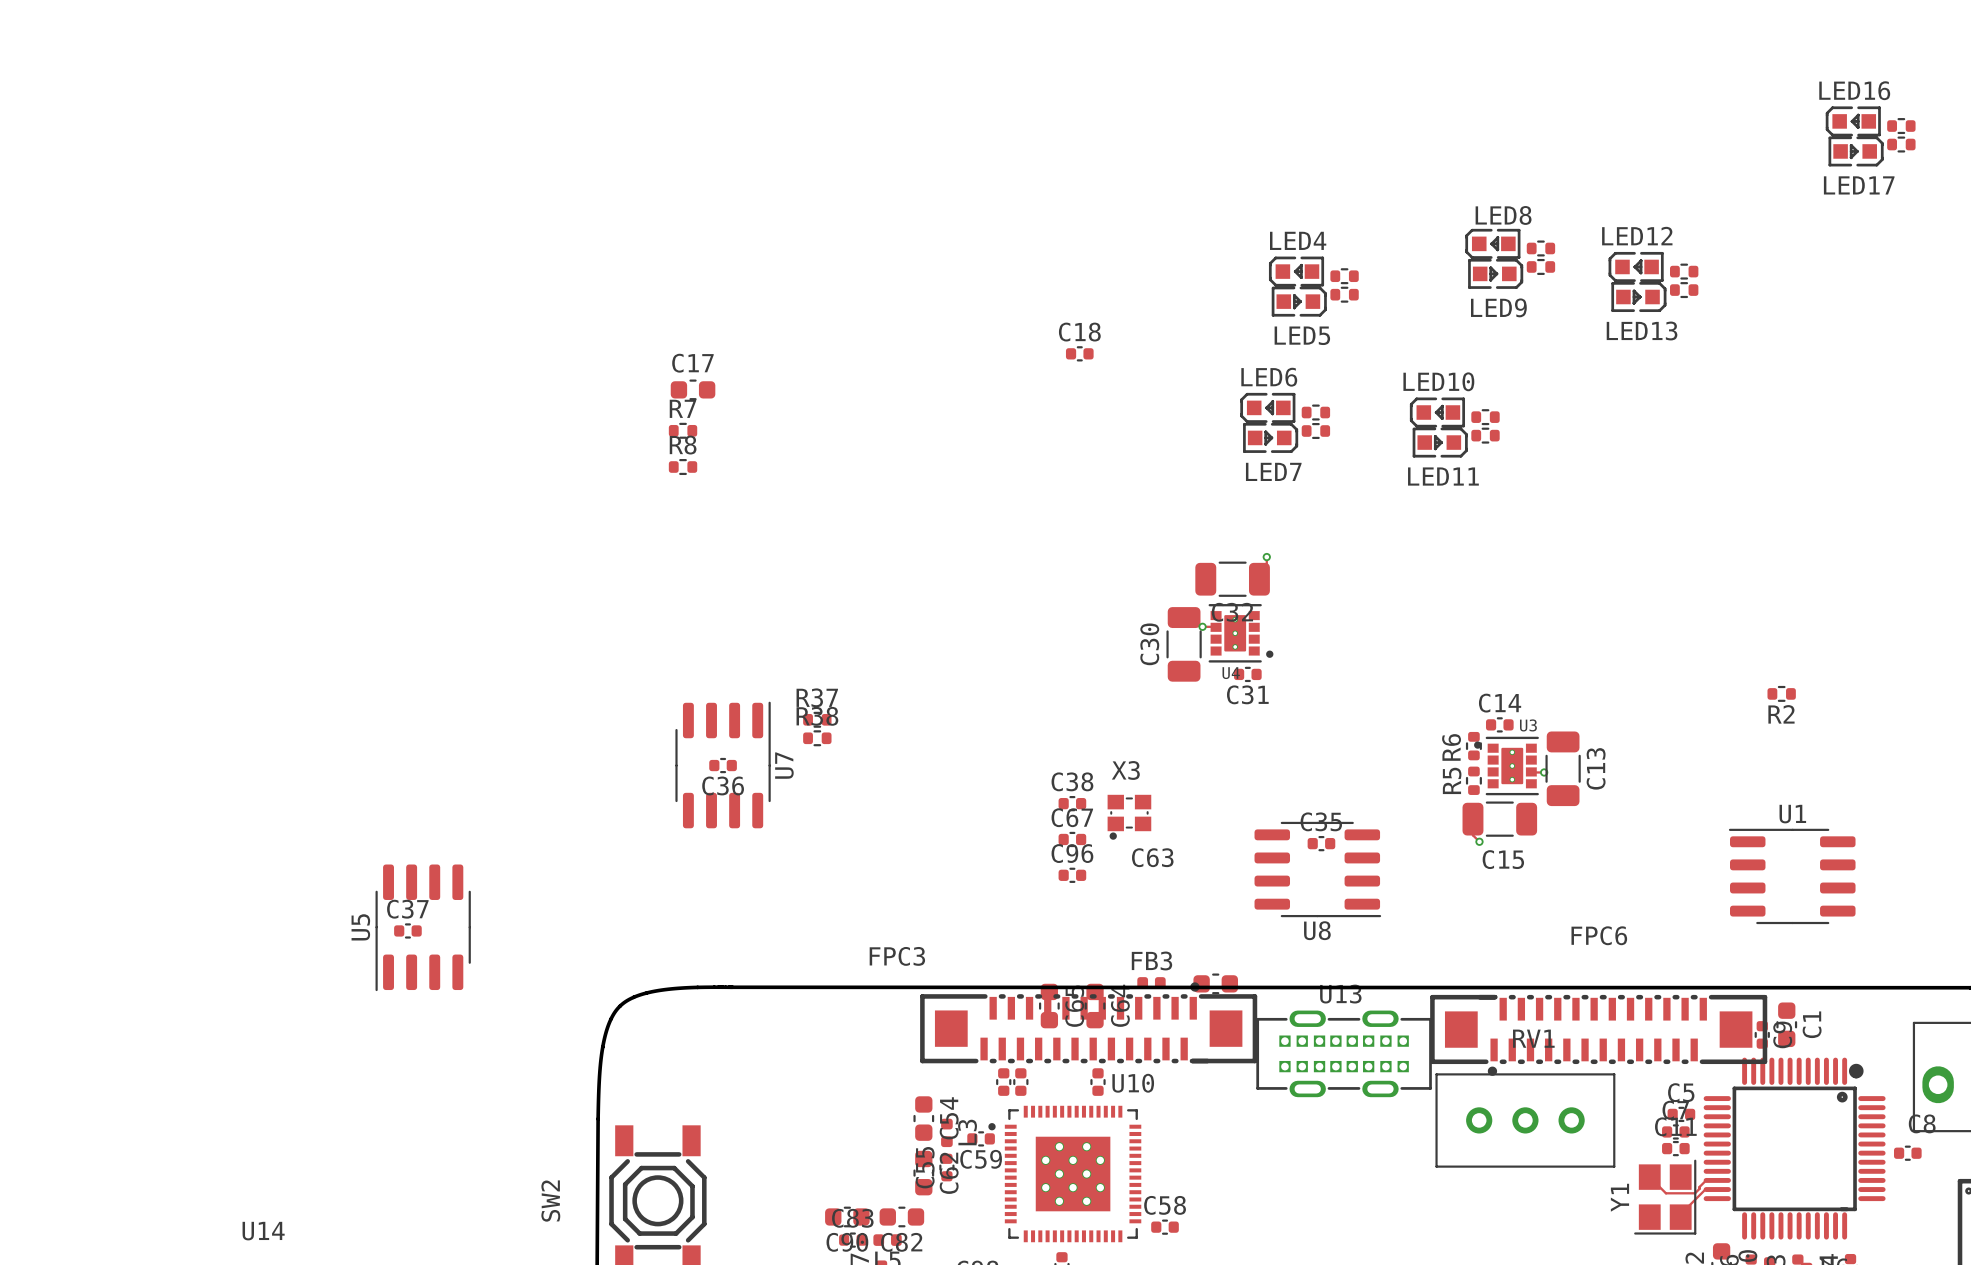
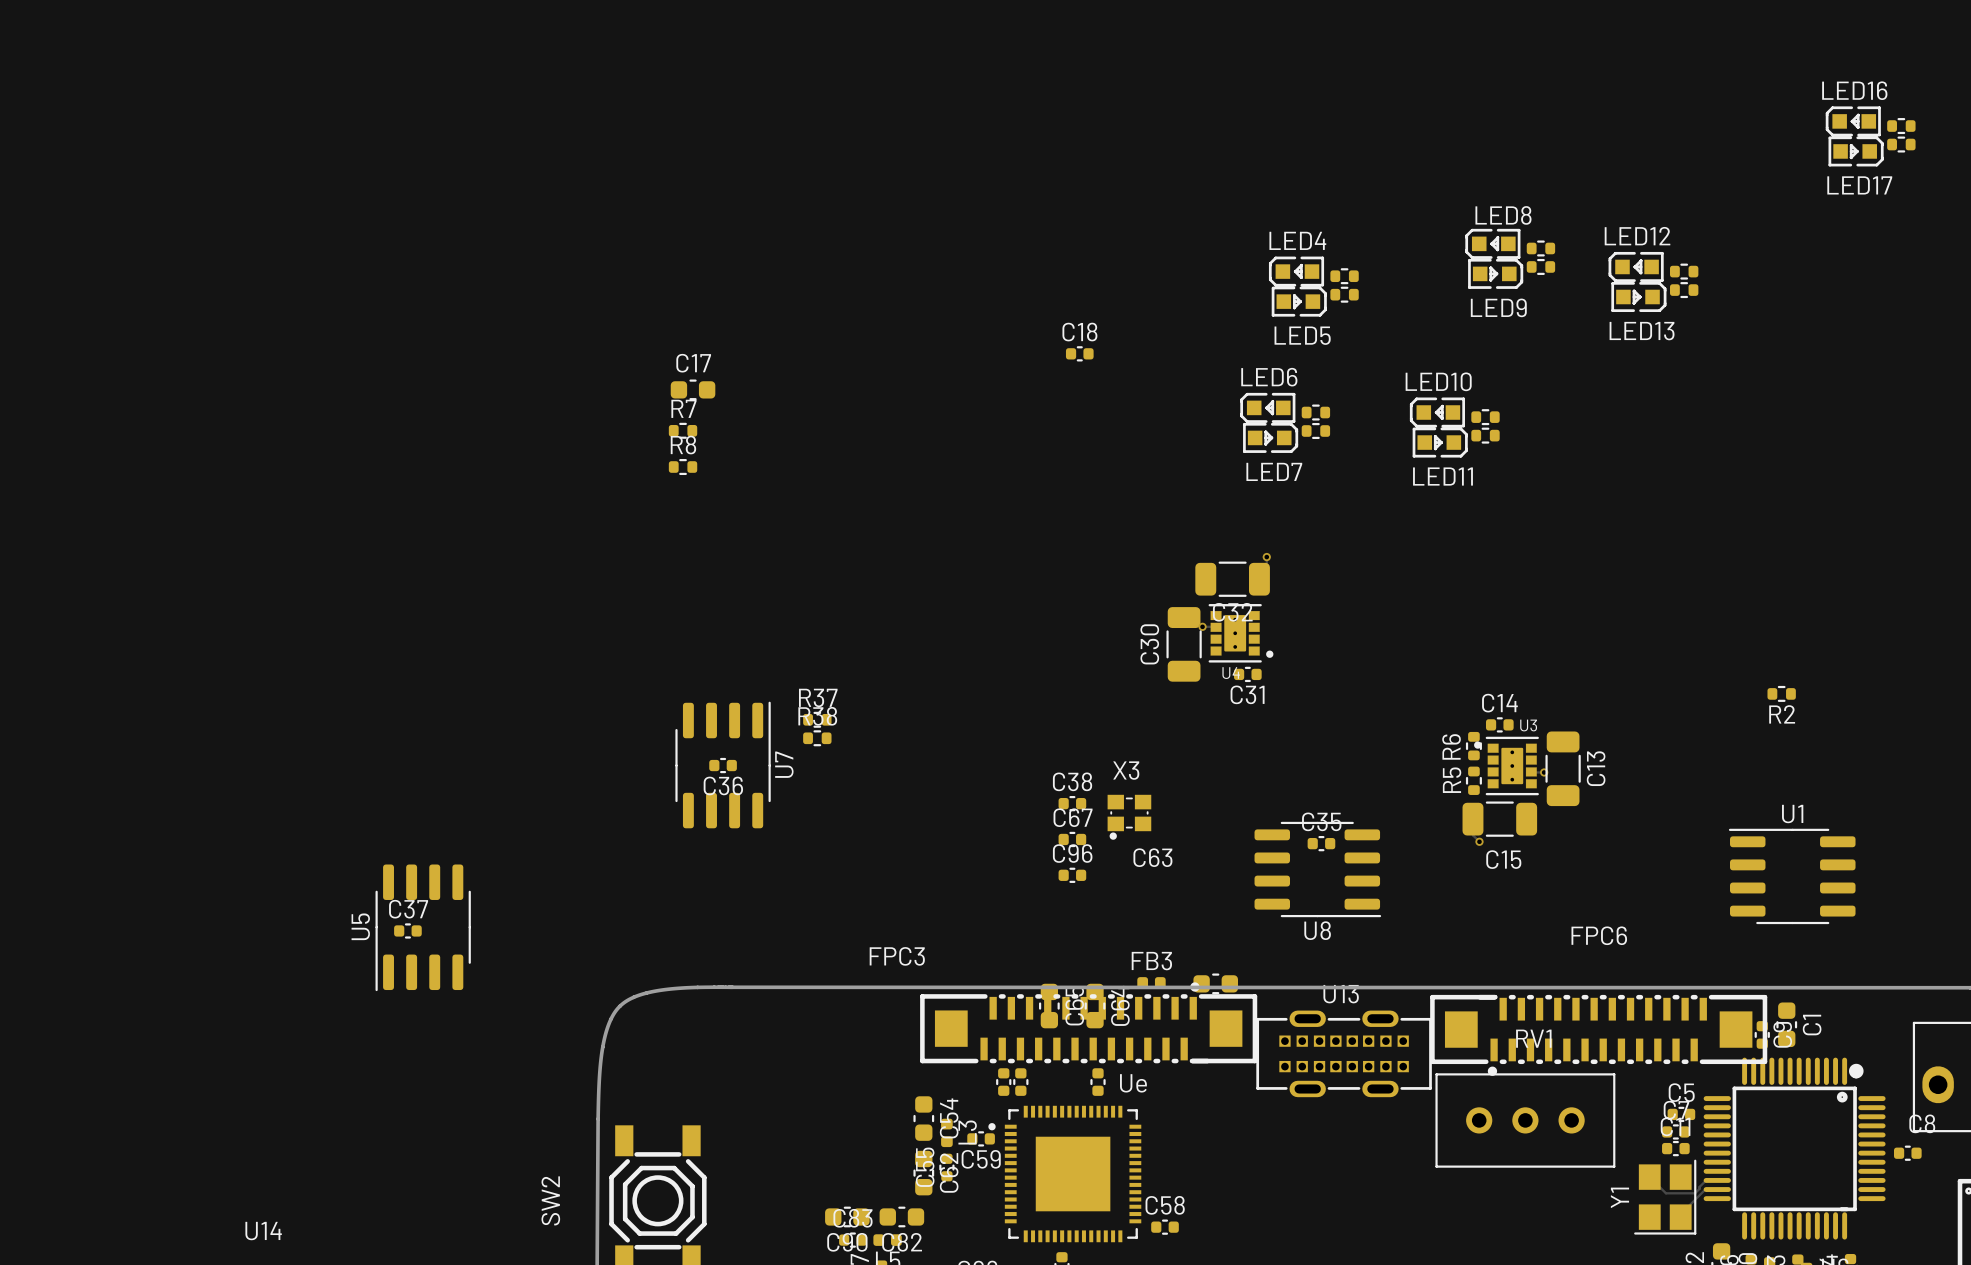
U10: (1064, 1174) -> none
Ue: none -> (1064, 1174)

